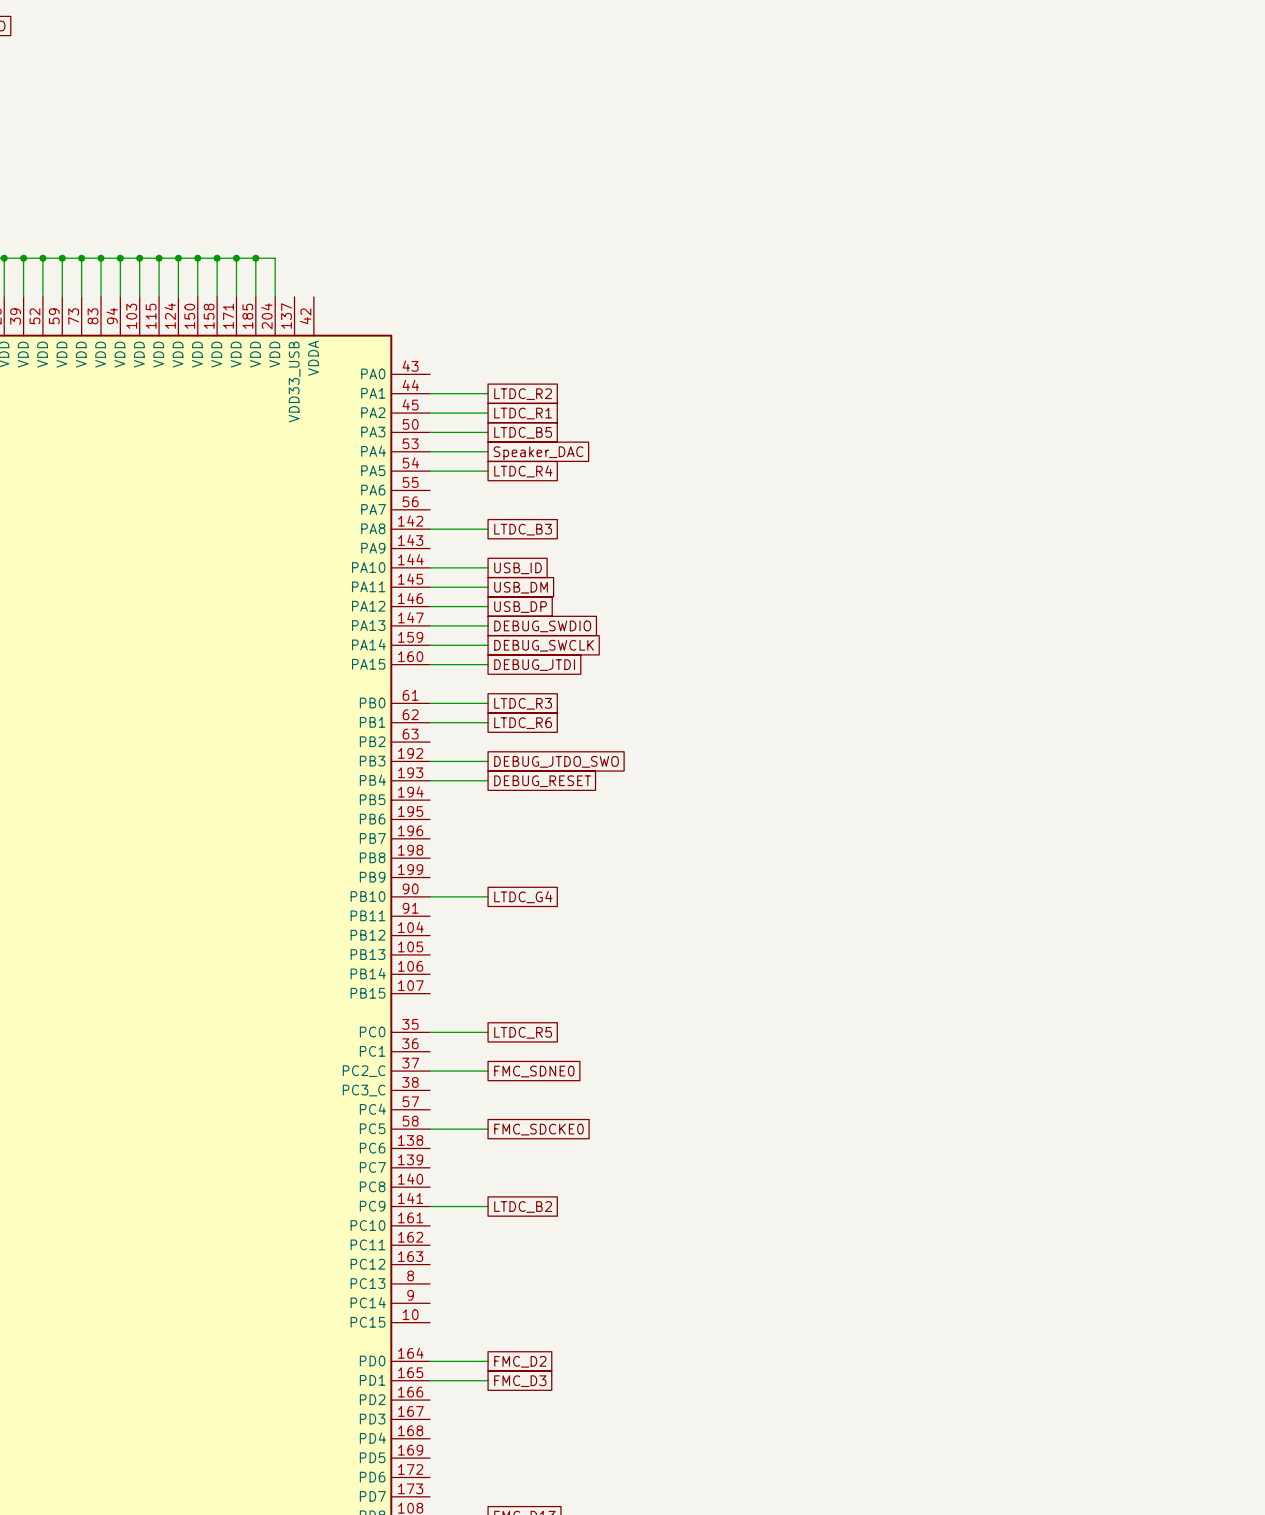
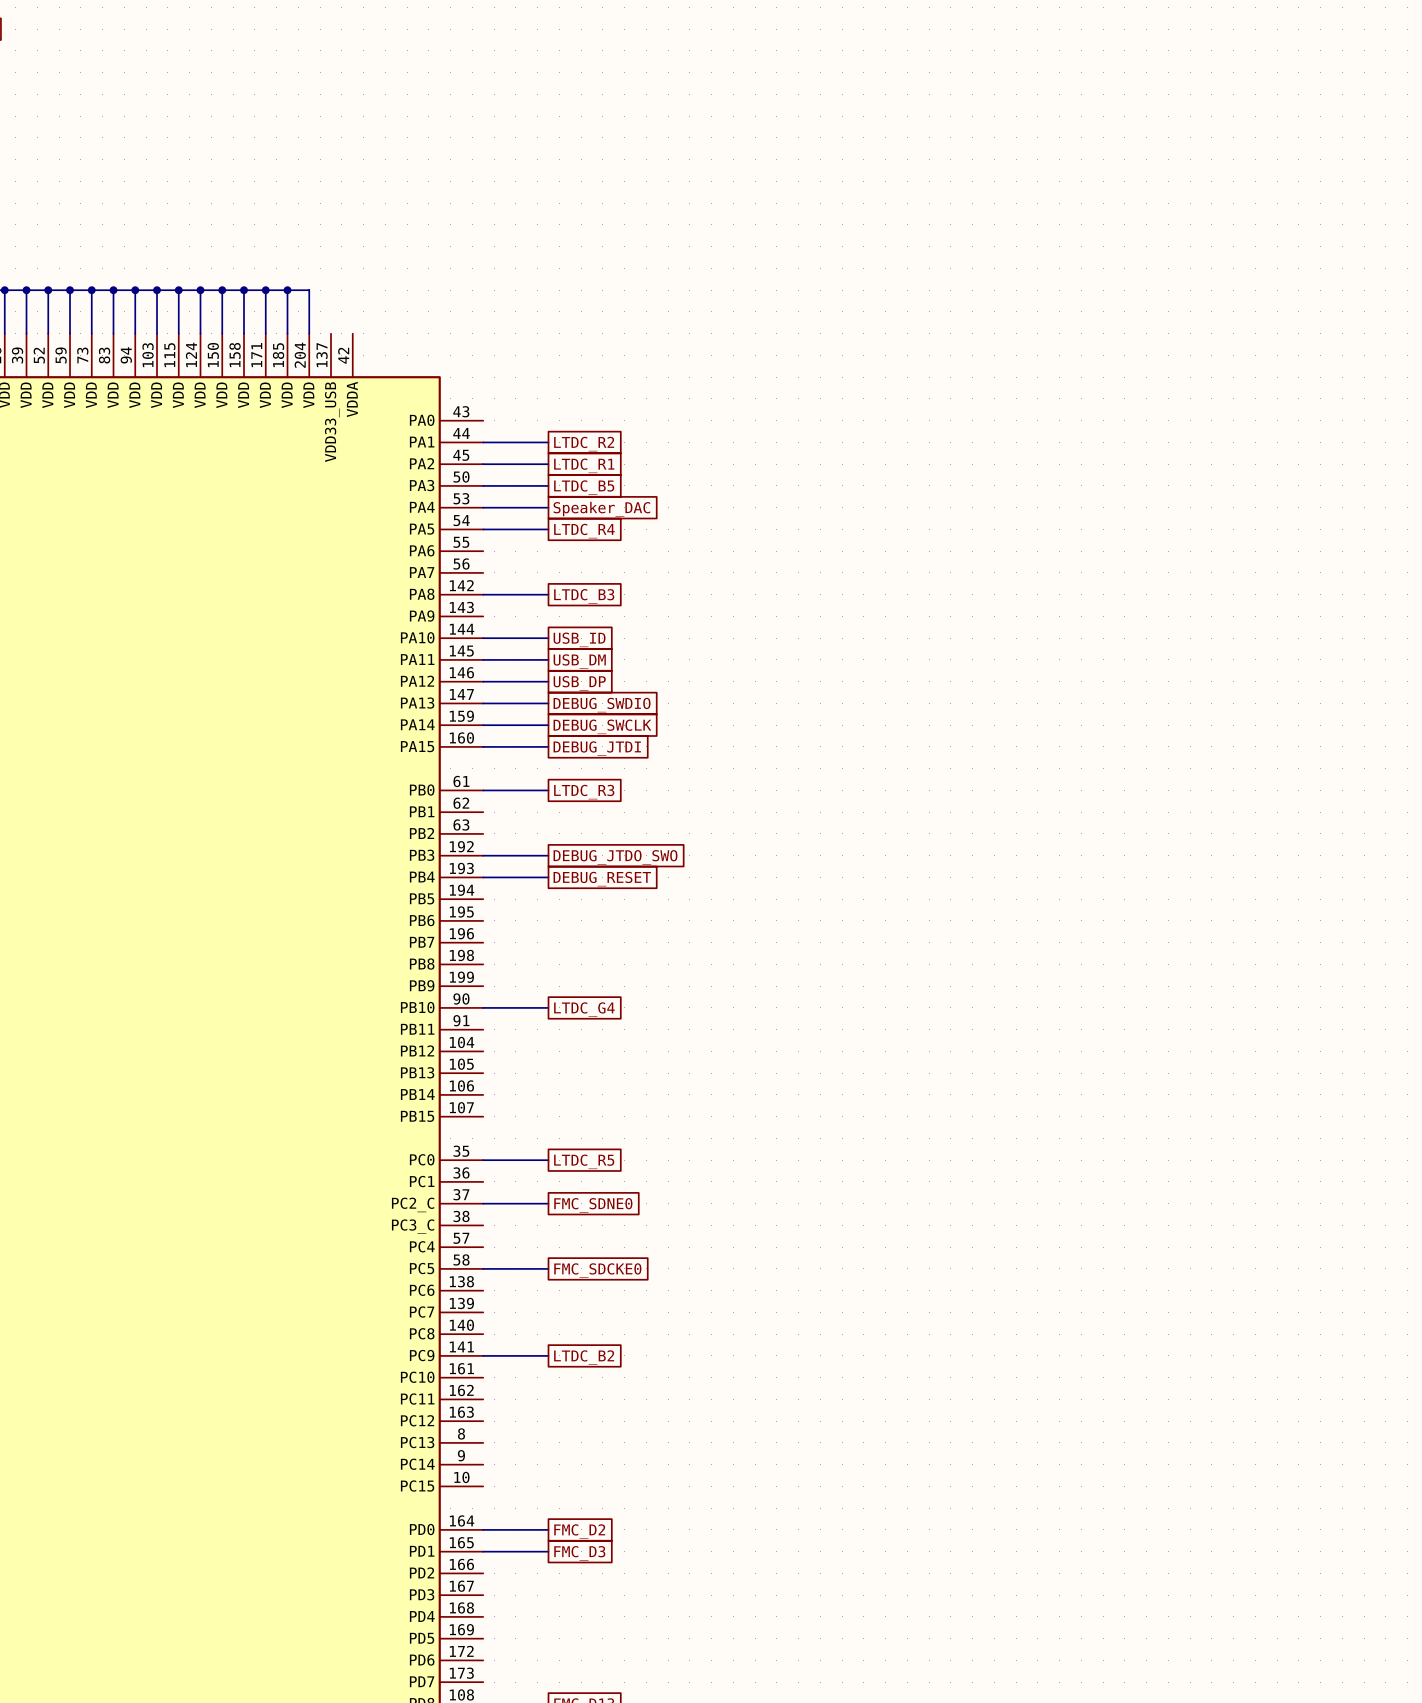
wire: (430, 722) (488, 722) -> none
global label: LTDC_R6 (523, 723) -> none

